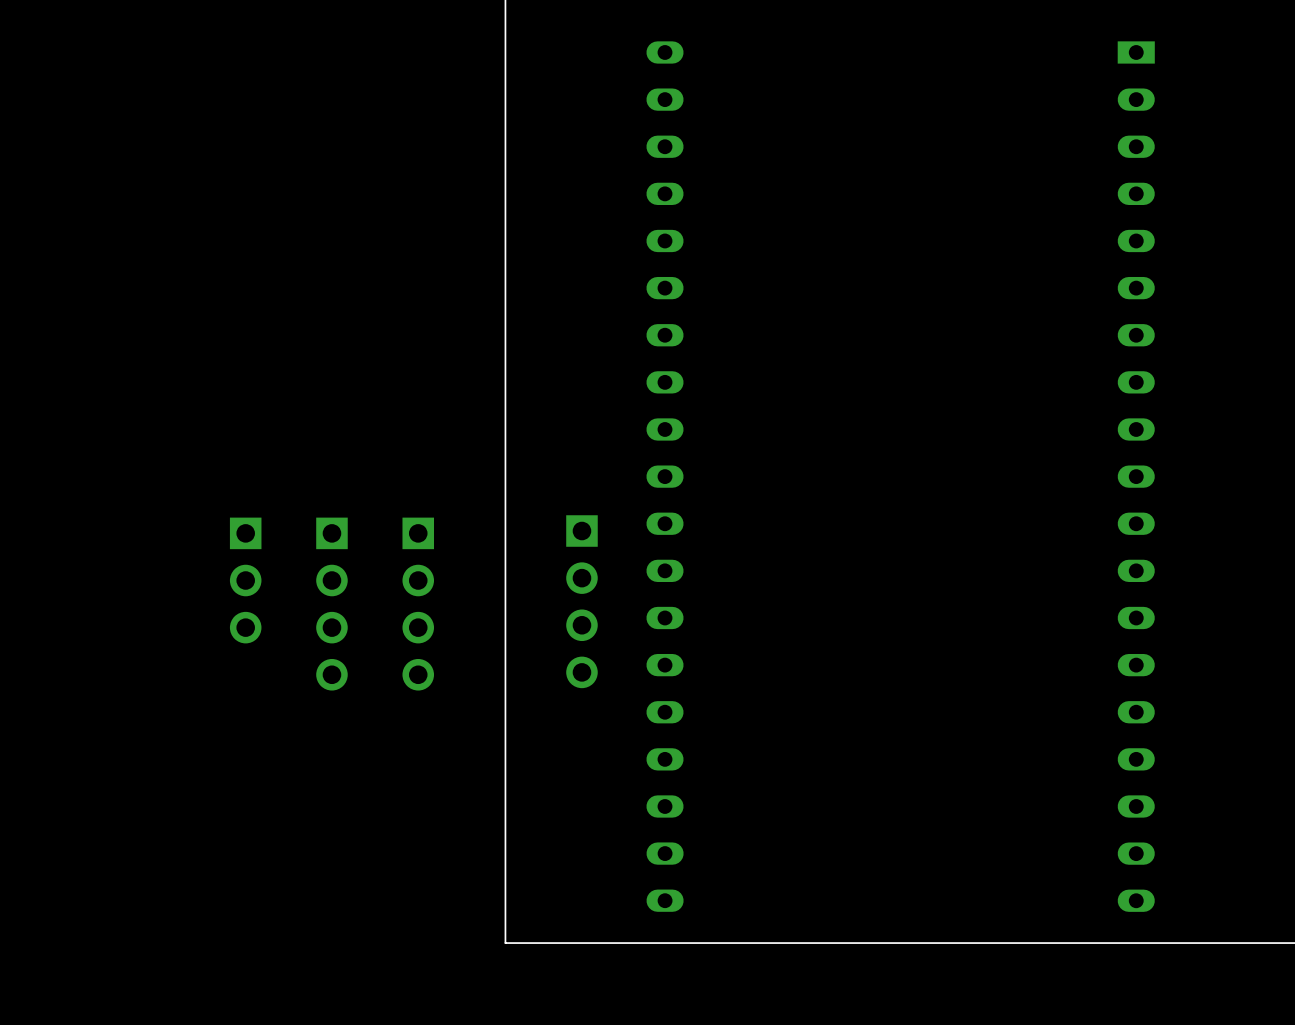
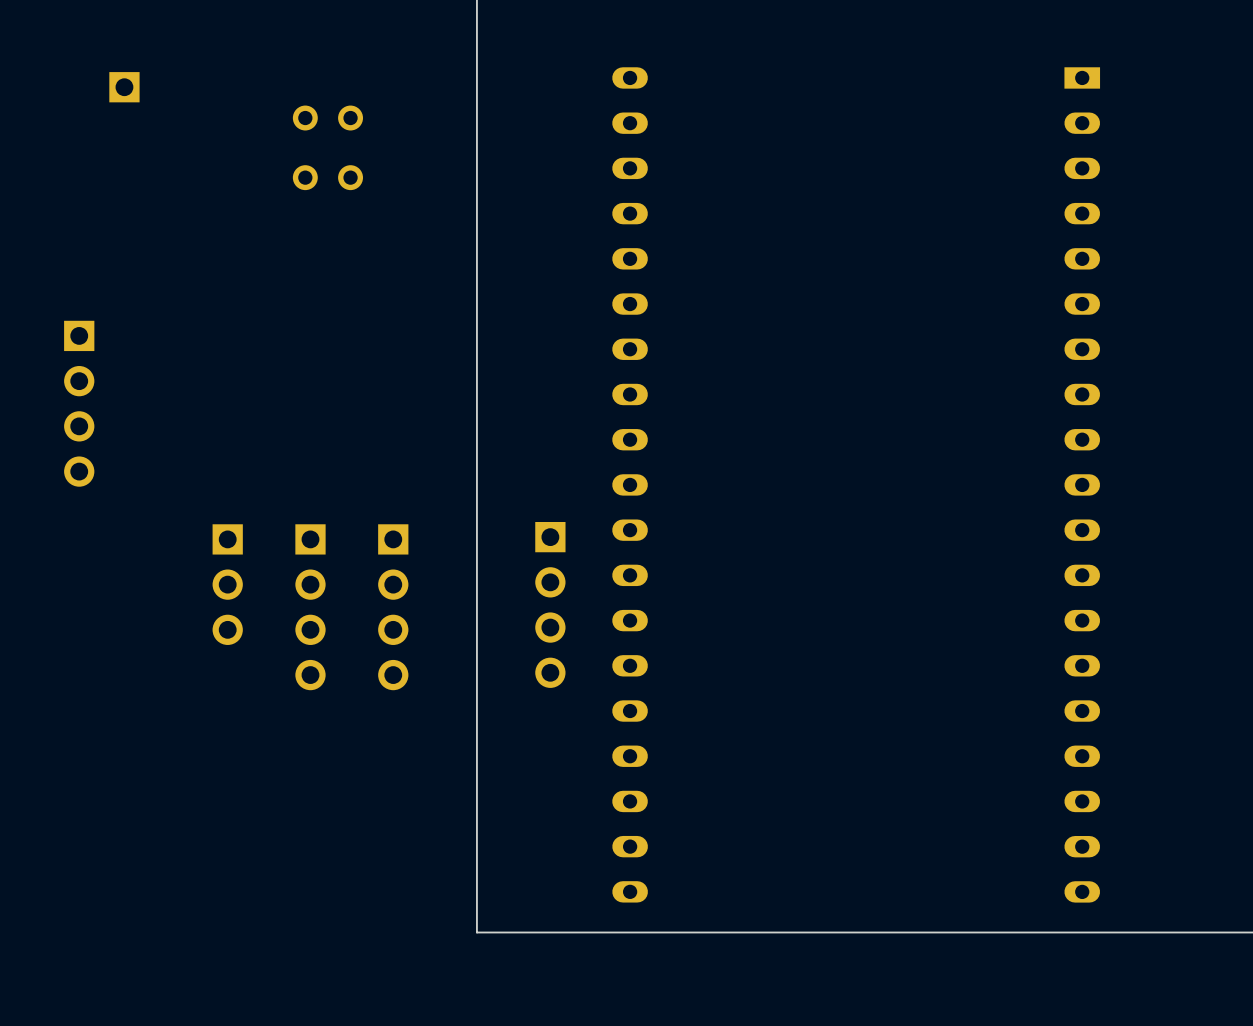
part: none -> (124, 87)
part: none -> (327, 118)
part: none -> (327, 177)
part: none -> (79, 403)

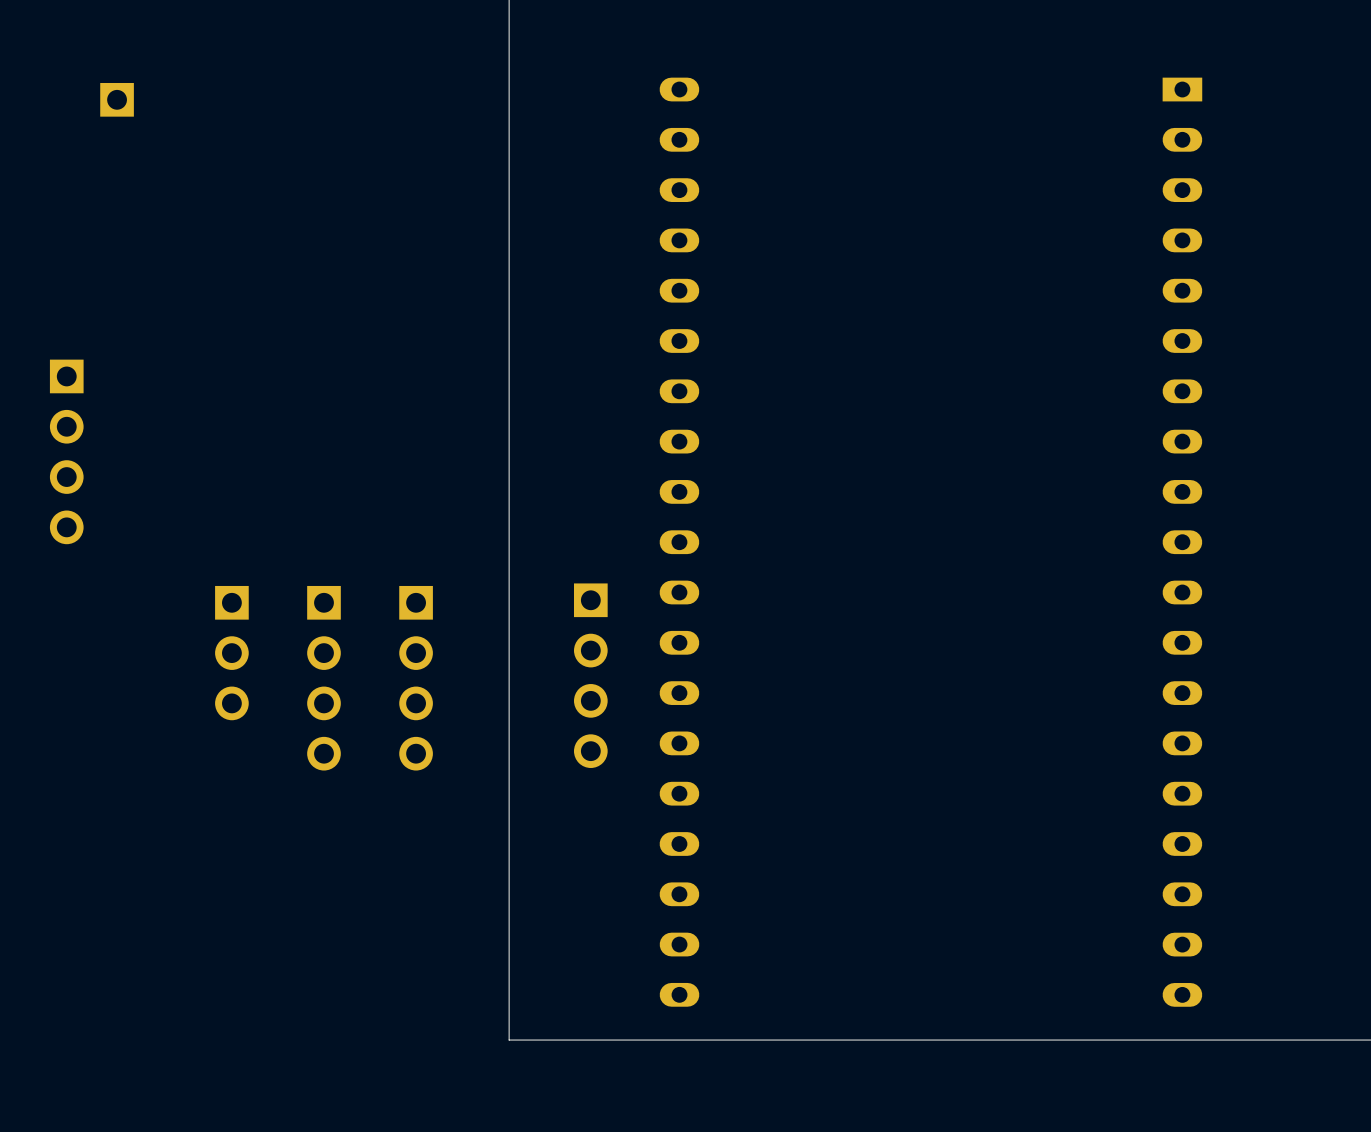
part: (327, 118) -> none
part: (327, 177) -> none

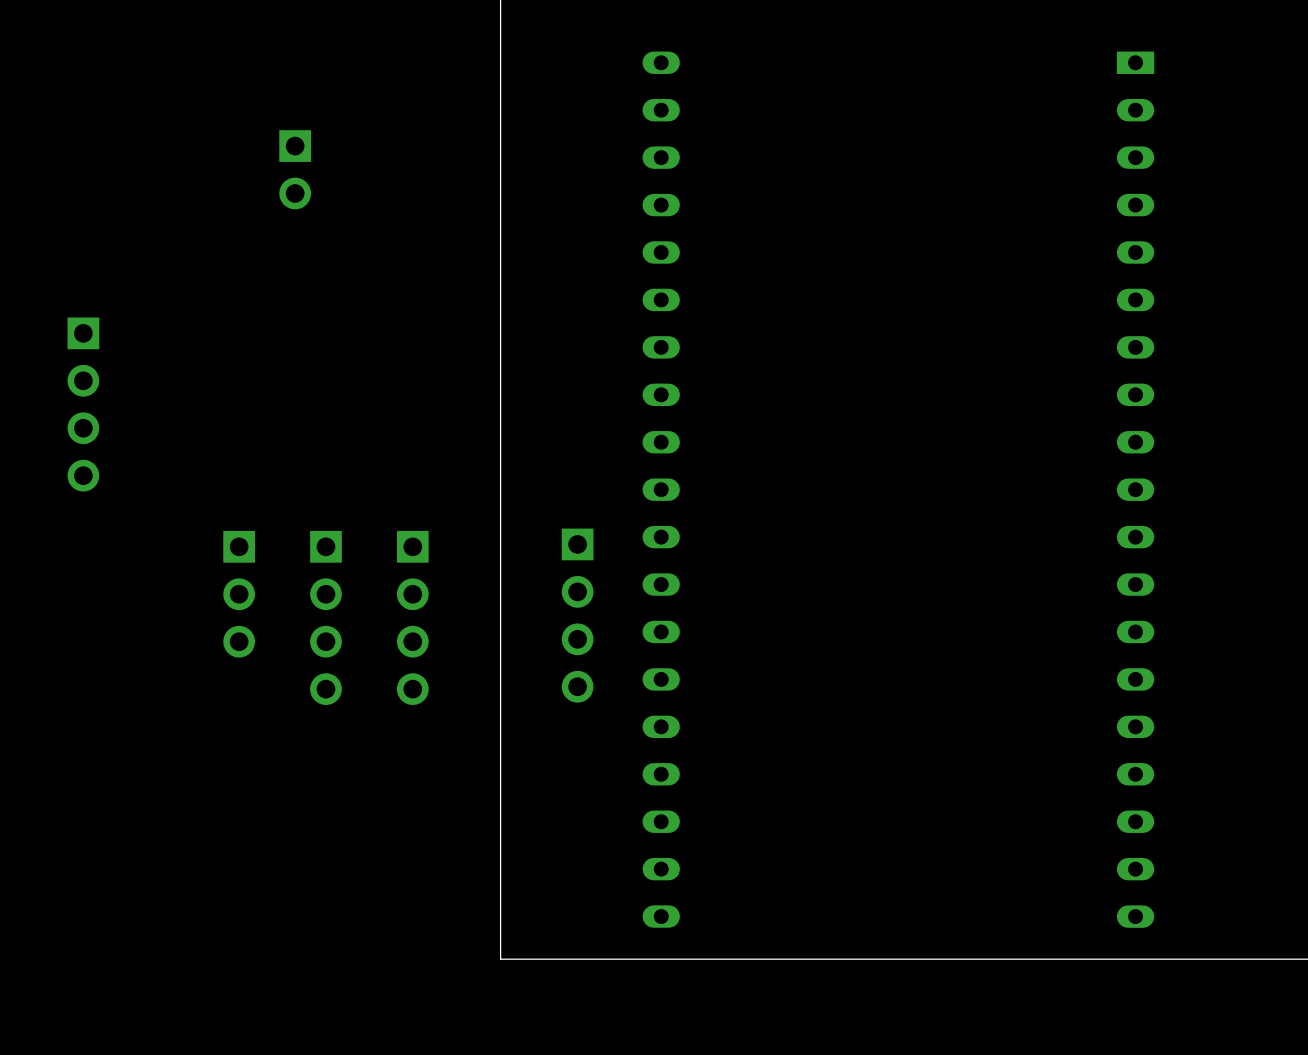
part: (117, 99) -> none
part: none -> (295, 169)

